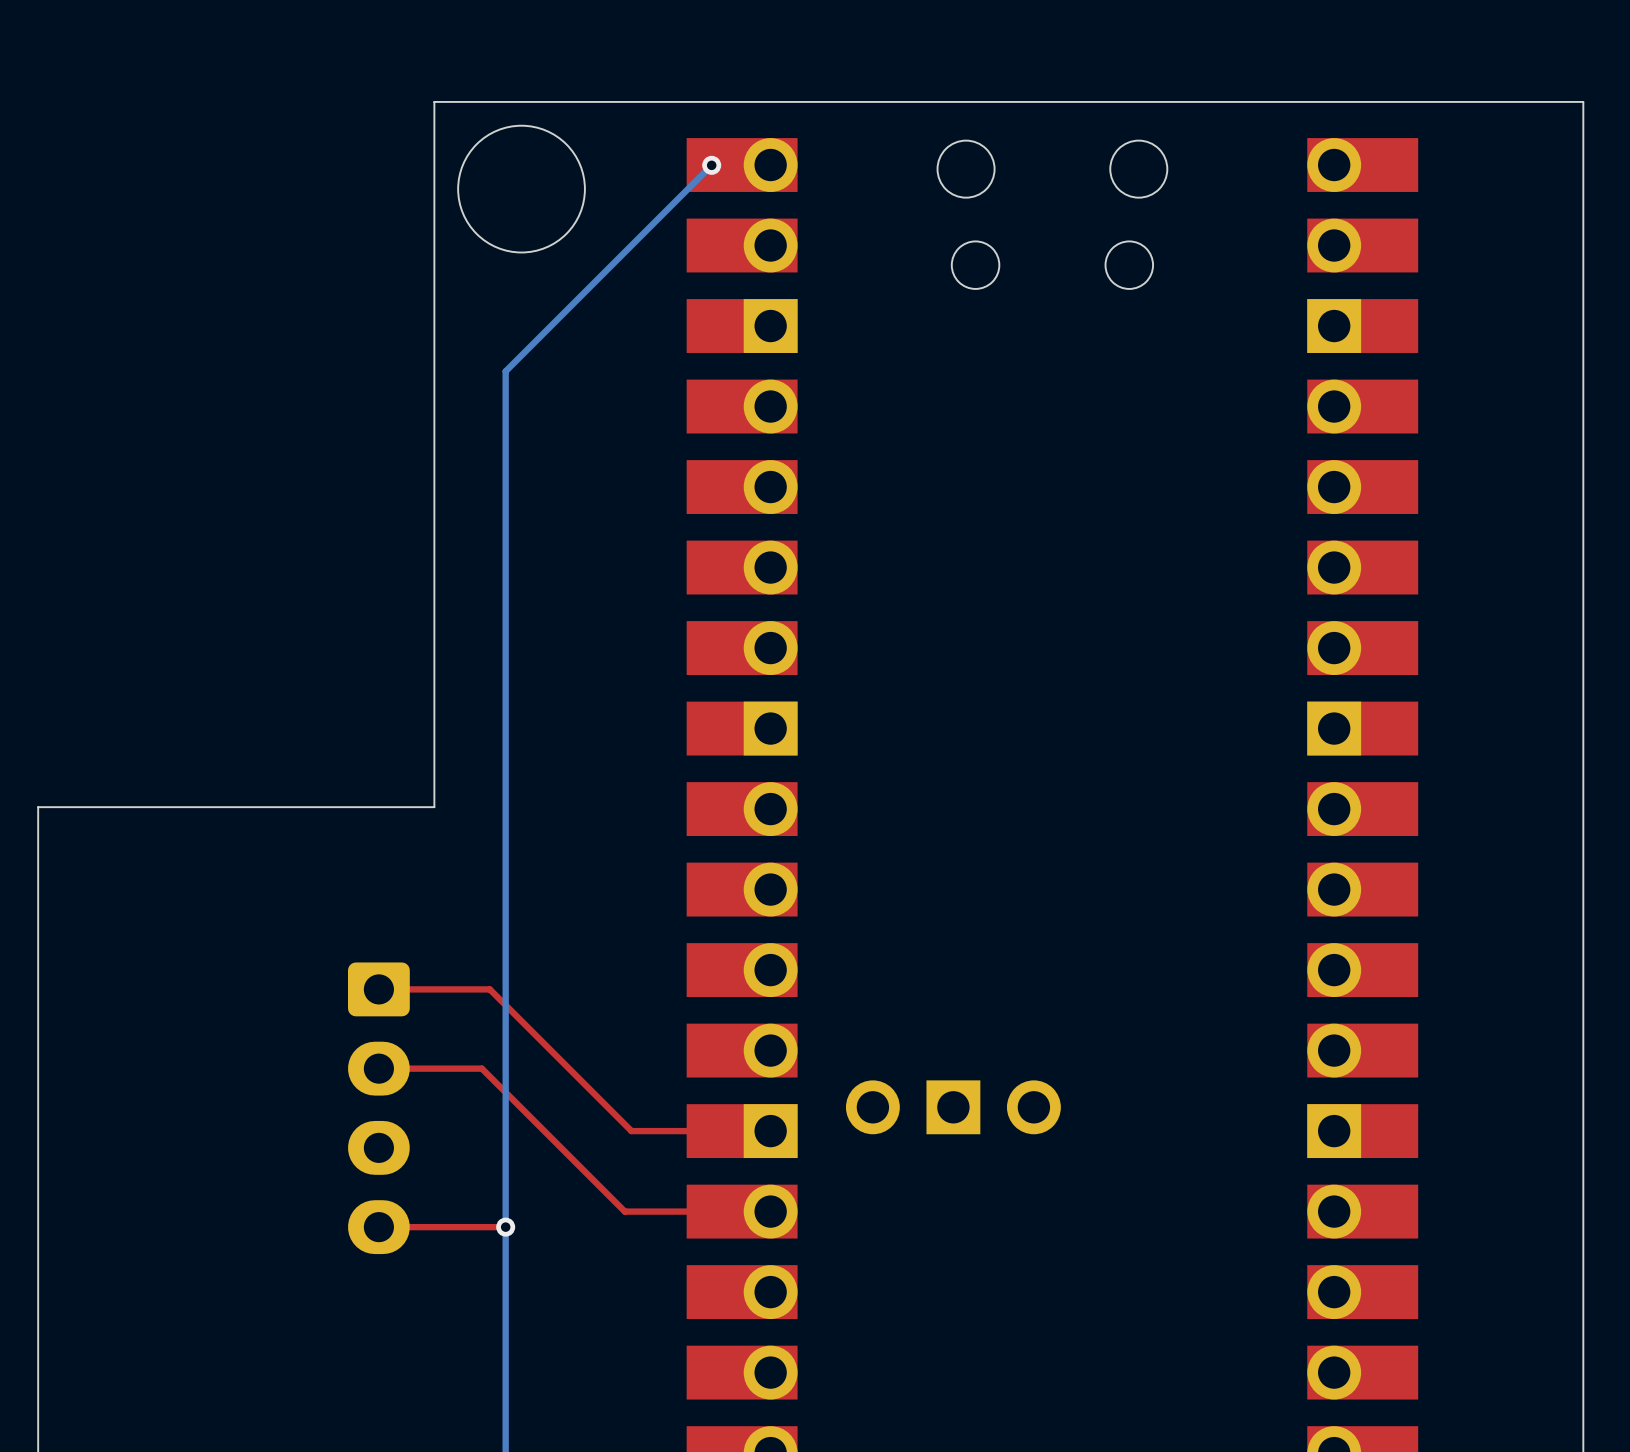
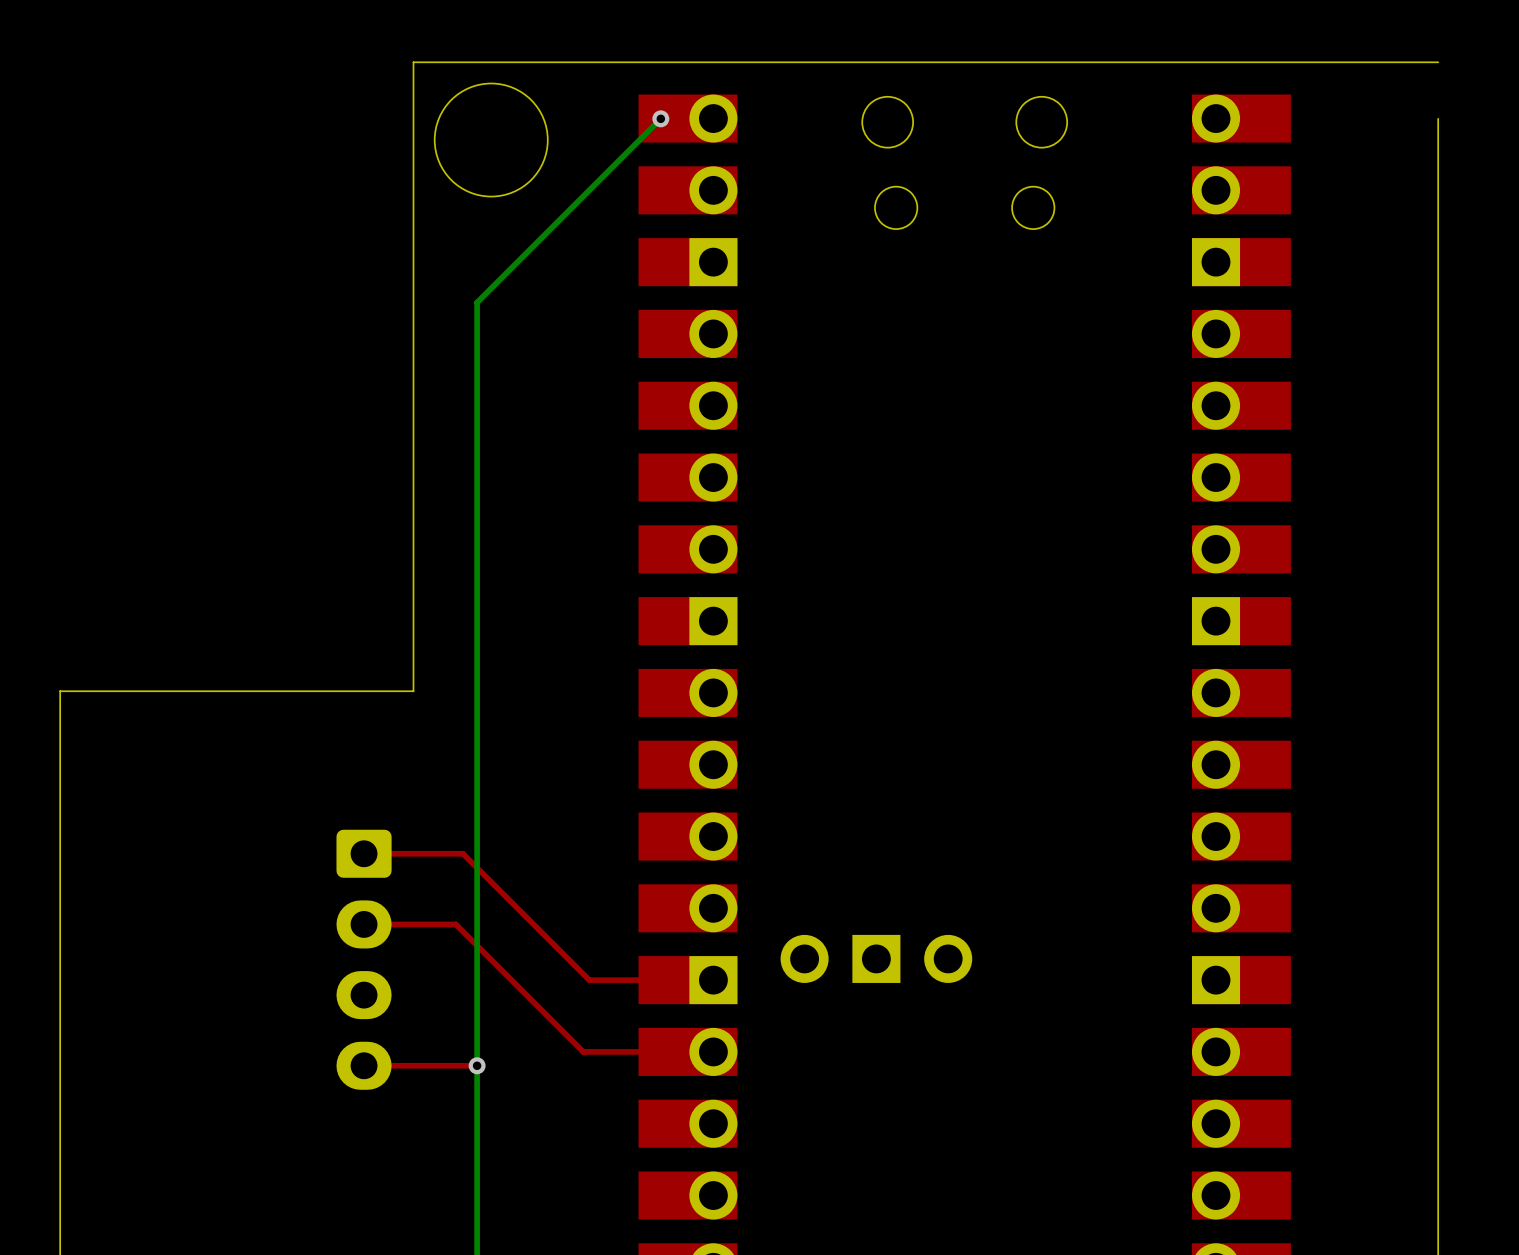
board edge: (1583, 101) (1583, 165) -> none

